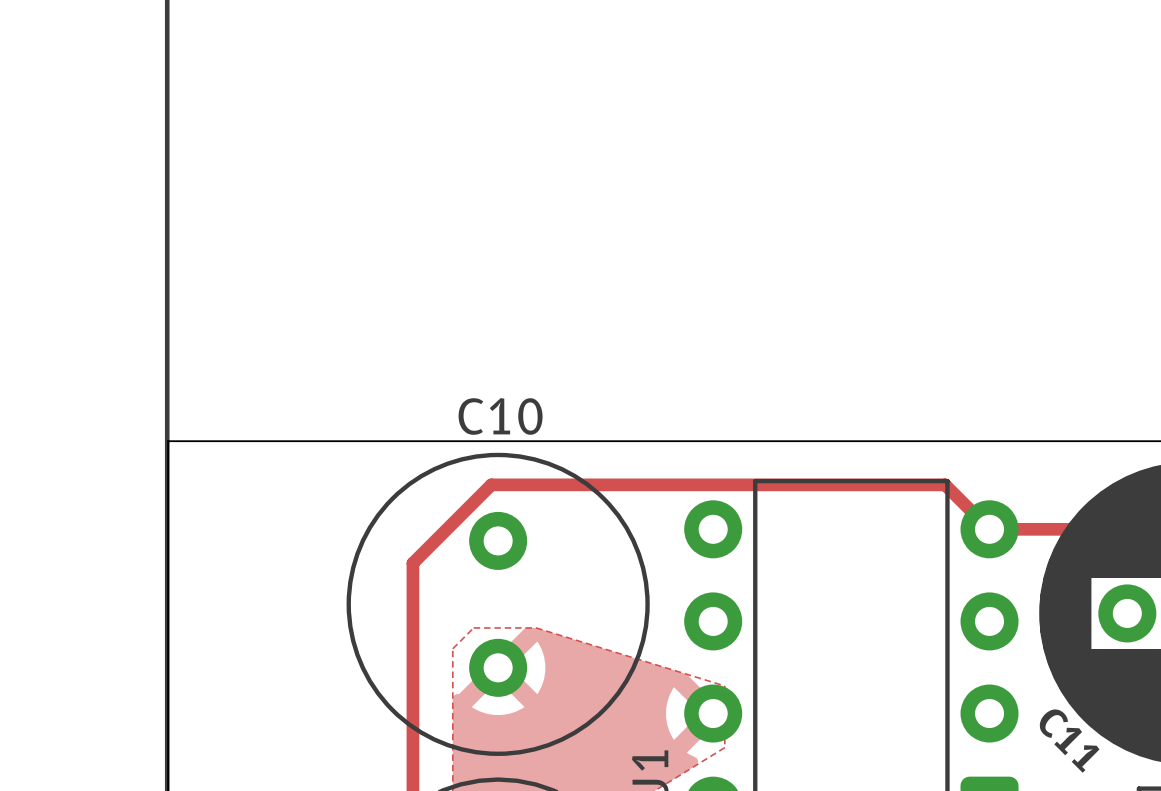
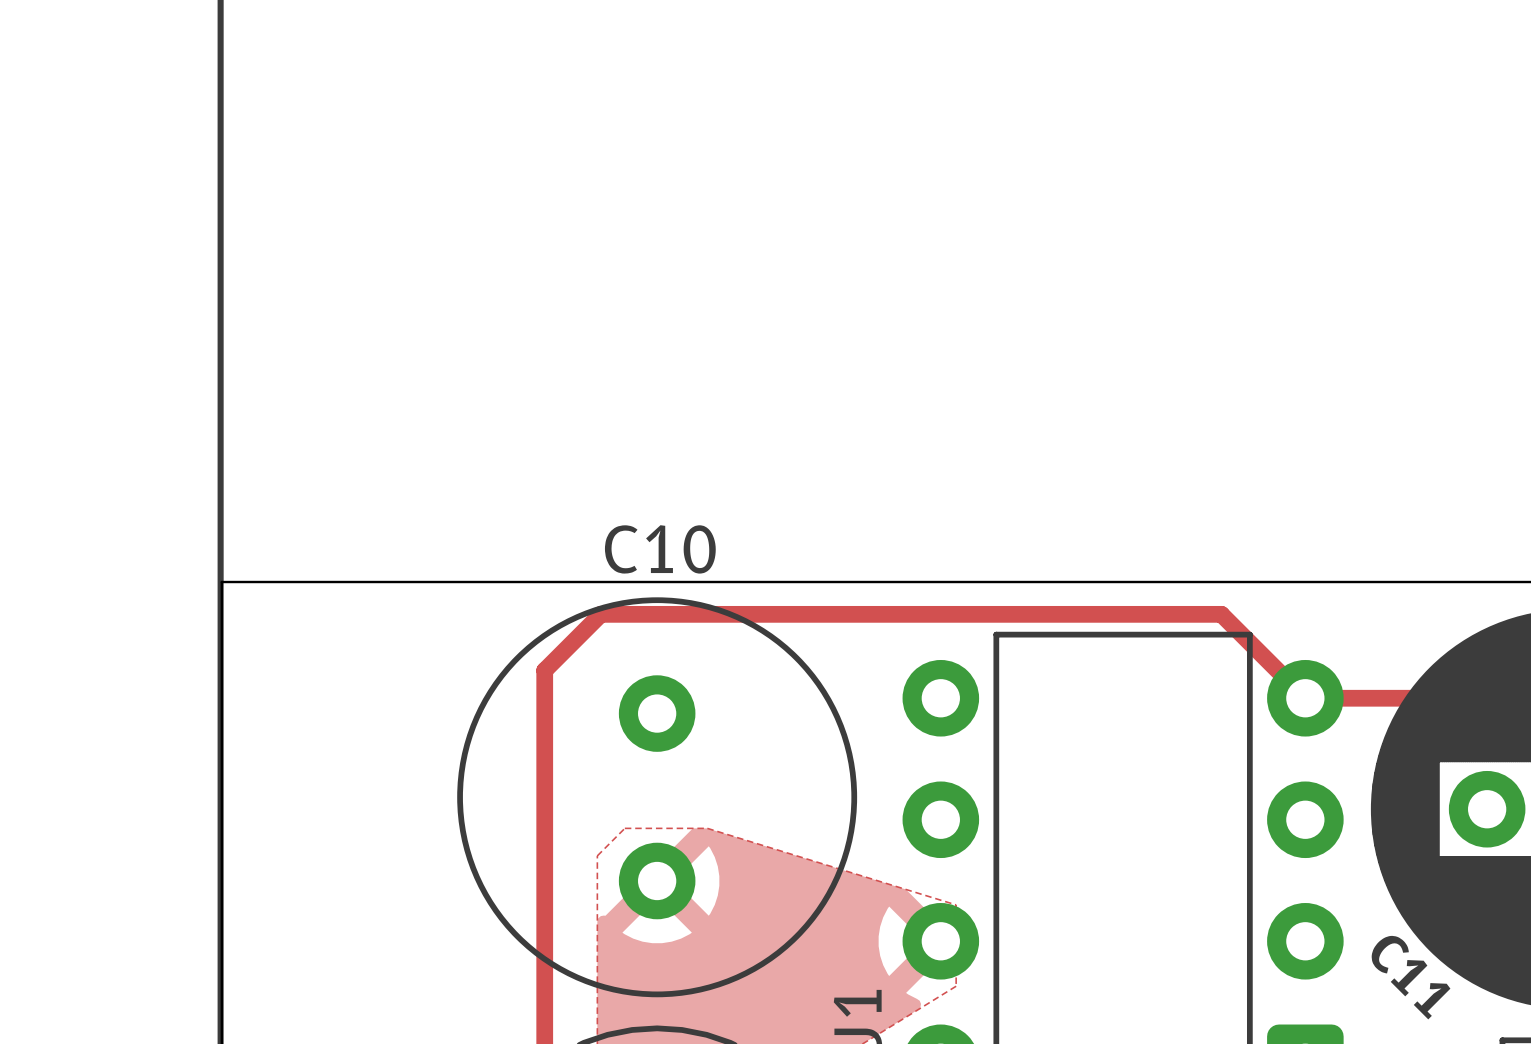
track: (945, 484) (491, 484) (412, 563) -> (1246, 639) (1221, 614) (600, 614) (544, 670) (544, 743)

